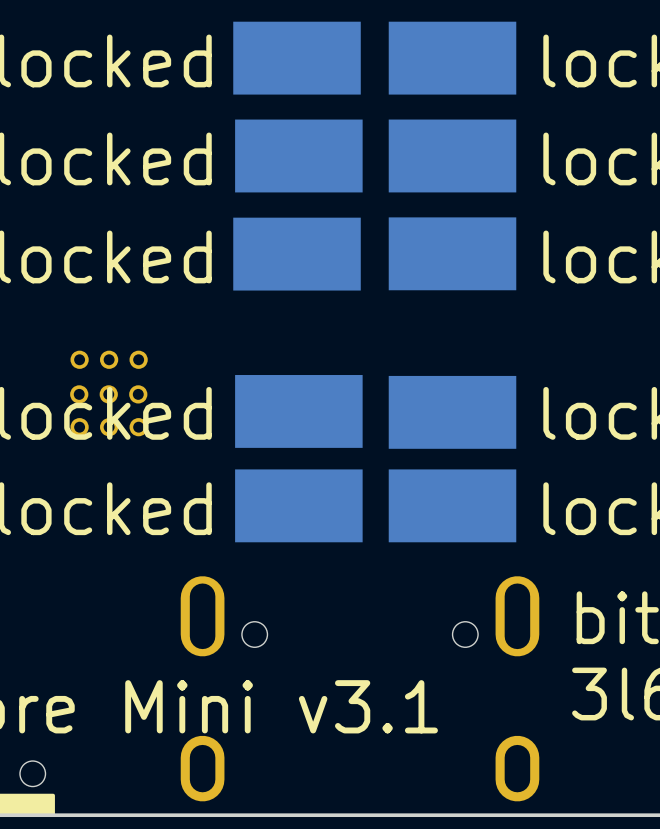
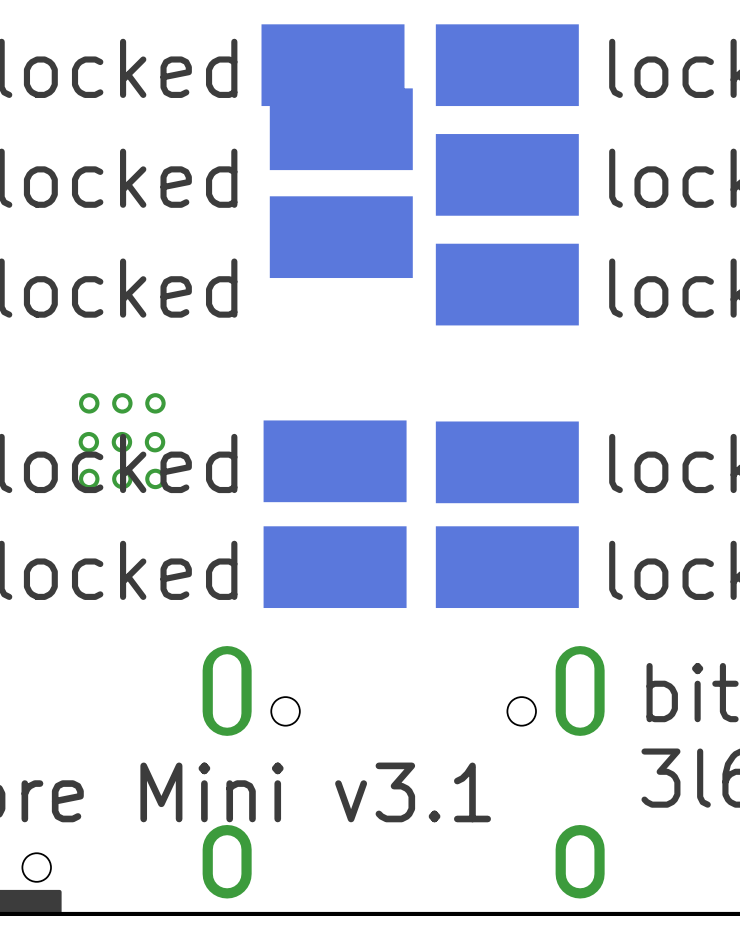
part: none -> (341, 129)
part: (298, 155) -> none
part: none -> (341, 237)
part: (297, 254) -> none

